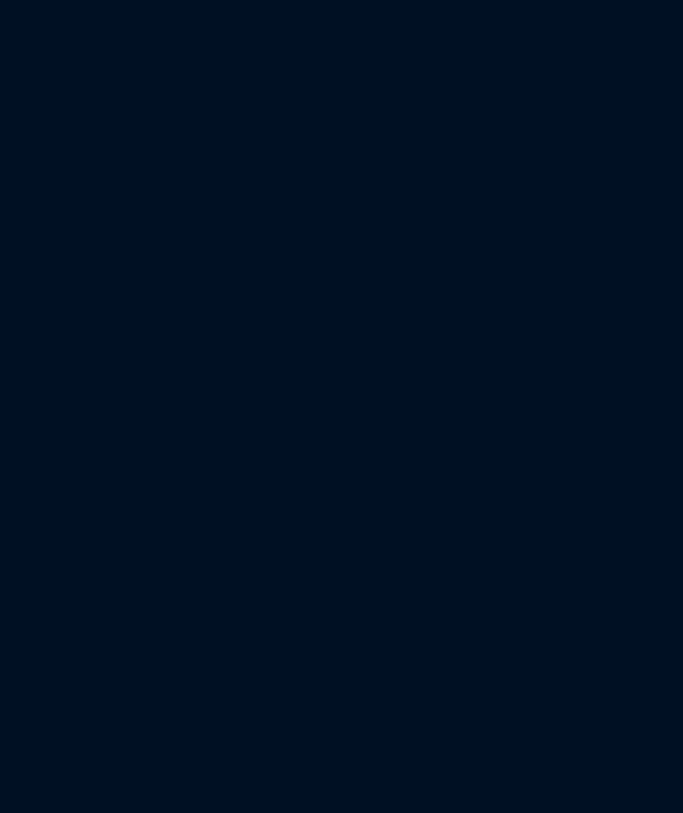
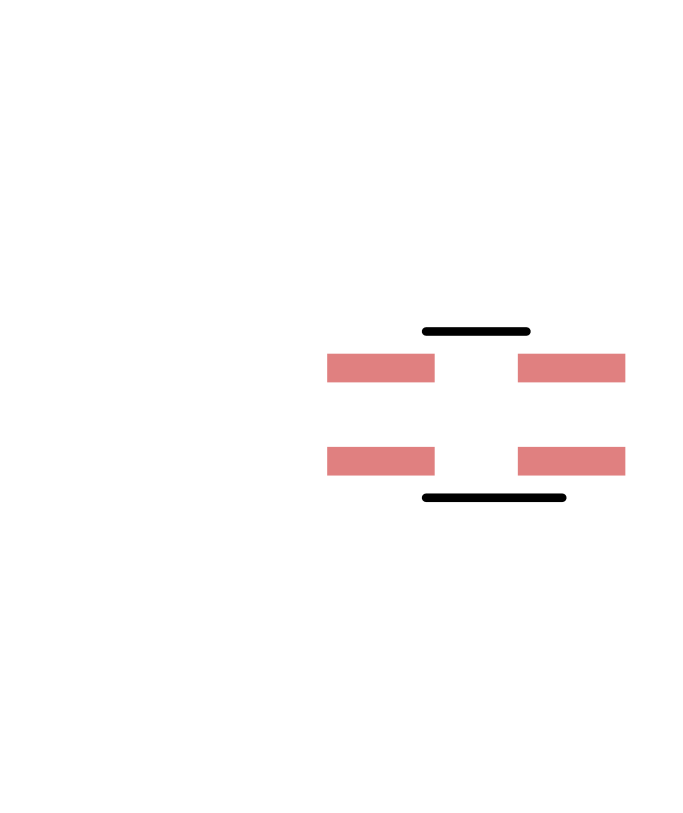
part: none -> (476, 414)

